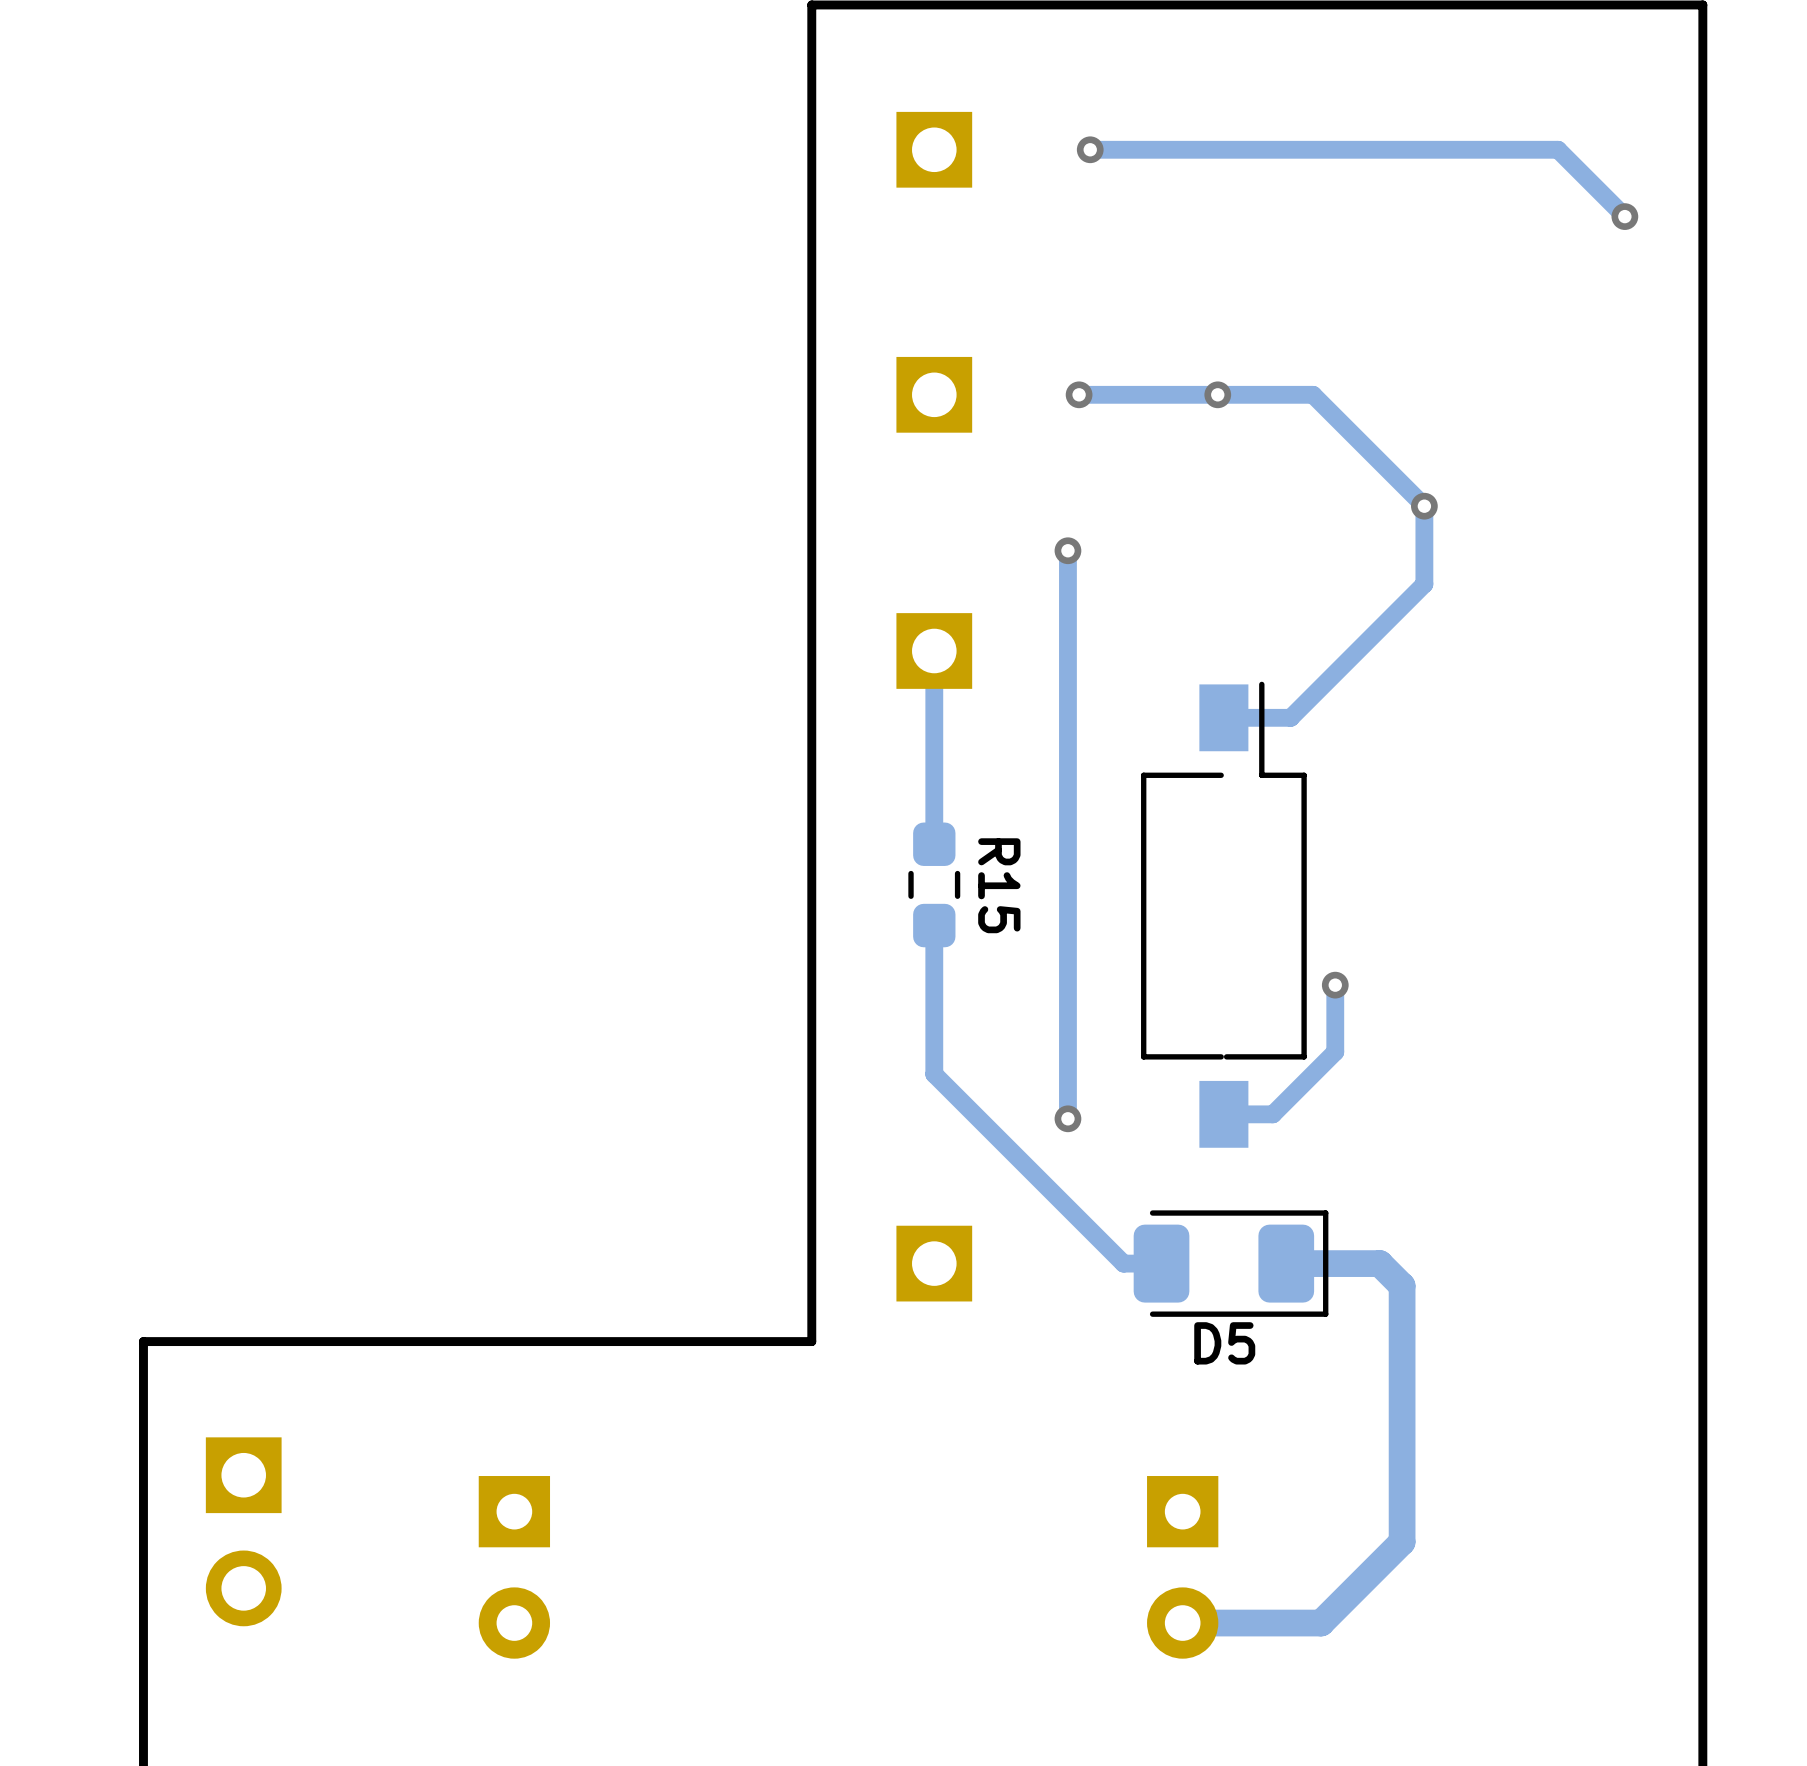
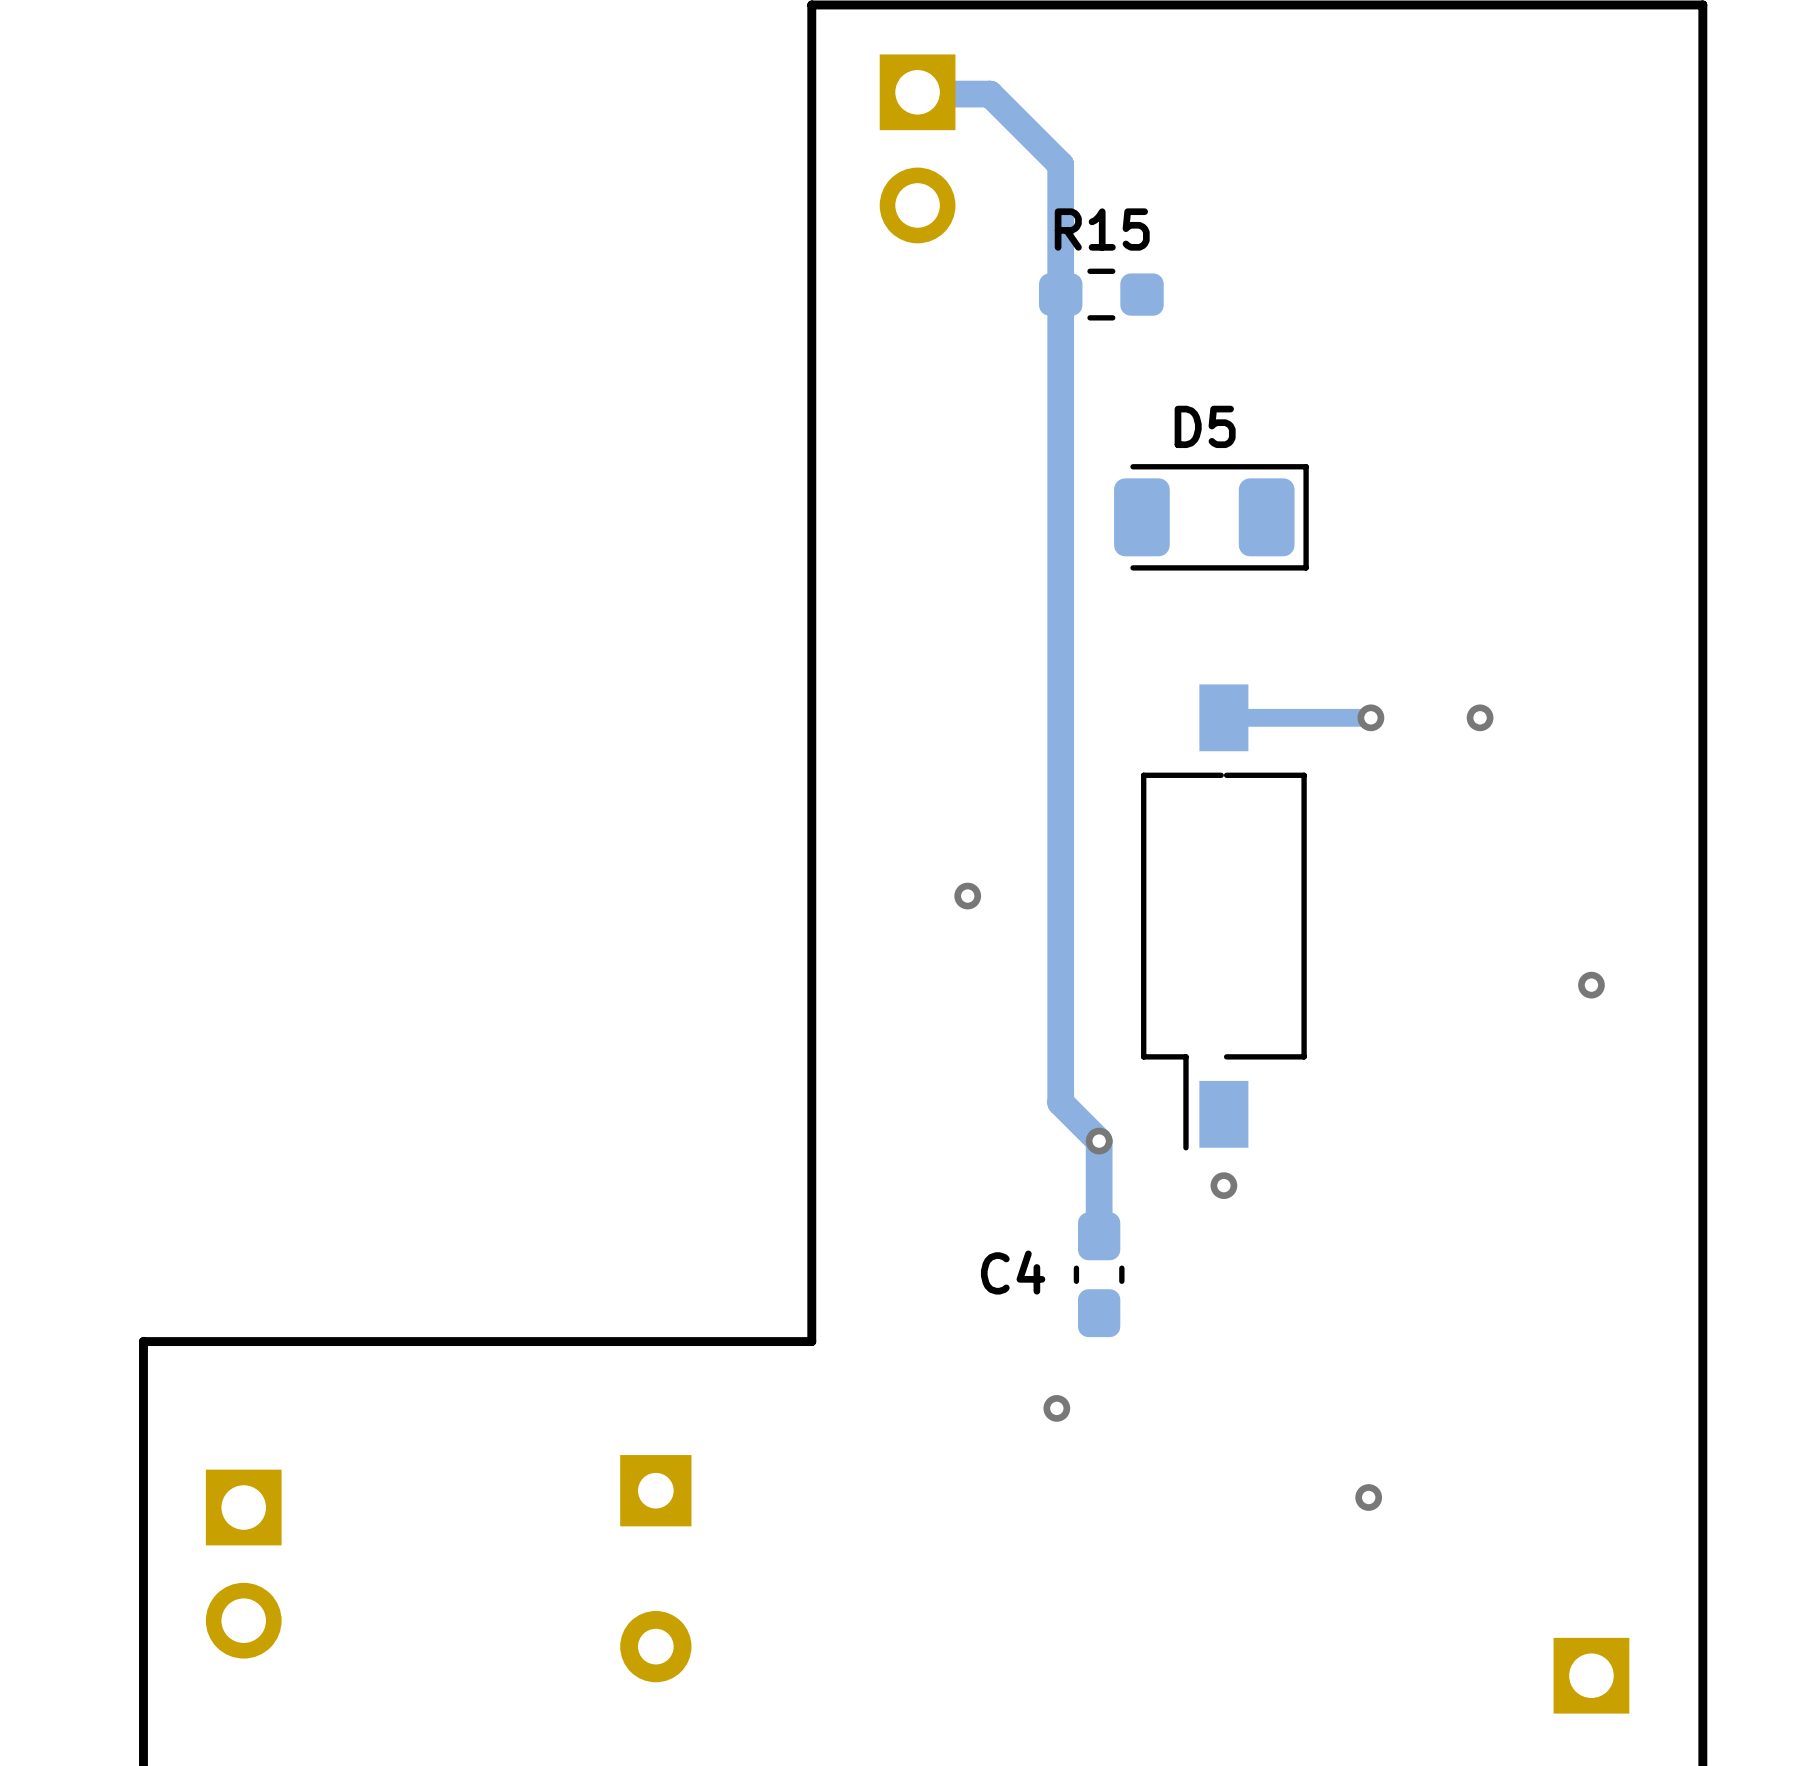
track: none -> (917, 94) (989, 94) (1060, 164) (1060, 1102) (1099, 1141) (1099, 1236)
part footprint: [896, 111, 973, 188] -> [879, 54, 956, 244]
track: (1090, 149) (1558, 149) (1624, 216) -> none
via: (1090, 149) -> none
via: (1624, 216) -> none
part: (934, 394) -> none
track: (1079, 394) (1313, 394) (1424, 506) (1424, 584) (1290, 717) -> (1370, 717) (1290, 717)
via: (1079, 394) -> none
via: (1217, 394) -> none
via: (1424, 506) -> none
track: (1067, 550) (1067, 1118) -> none
via: (1067, 550) -> none
track: (934, 650) (934, 844) -> none
part: (934, 650) -> none
via: none -> (1370, 717)
via: none -> (1480, 717)
R15 rotation: 0° (934, 884) -> 90° clockwise (1101, 294)
R15 position: (934, 884) -> (1101, 294)
R15 name position: R15 (999, 885) -> R15 (1102, 229)
via: none -> (967, 896)
part rotation: 0° (1223, 914) -> 180° (1223, 917)
track: (934, 925) (934, 1074) (1123, 1263) (1161, 1263) -> none
track: (1335, 985) (1335, 1051) (1272, 1114) (1223, 1114) -> none
via: (1335, 985) -> none
via: none -> (1591, 985)
via position: (1067, 1118) -> (1099, 1141)
via: none -> (1223, 1185)
part: (934, 1263) -> none
D5 position: (1231, 1263) -> (1211, 517)
track: (1286, 1263) (1379, 1263) (1402, 1285) (1402, 1542) (1321, 1623) (1182, 1623) -> none
C4: none -> (1099, 1274)
D5 name position: D5 (1224, 1343) -> D5 (1205, 426)
via: none -> (1056, 1408)
via: none -> (1368, 1497)
part position: (243, 1531) -> (243, 1564)
part: (514, 1567) -> none
part: (1182, 1567) -> none
part: none -> (655, 1568)
part: none -> (1591, 1675)

